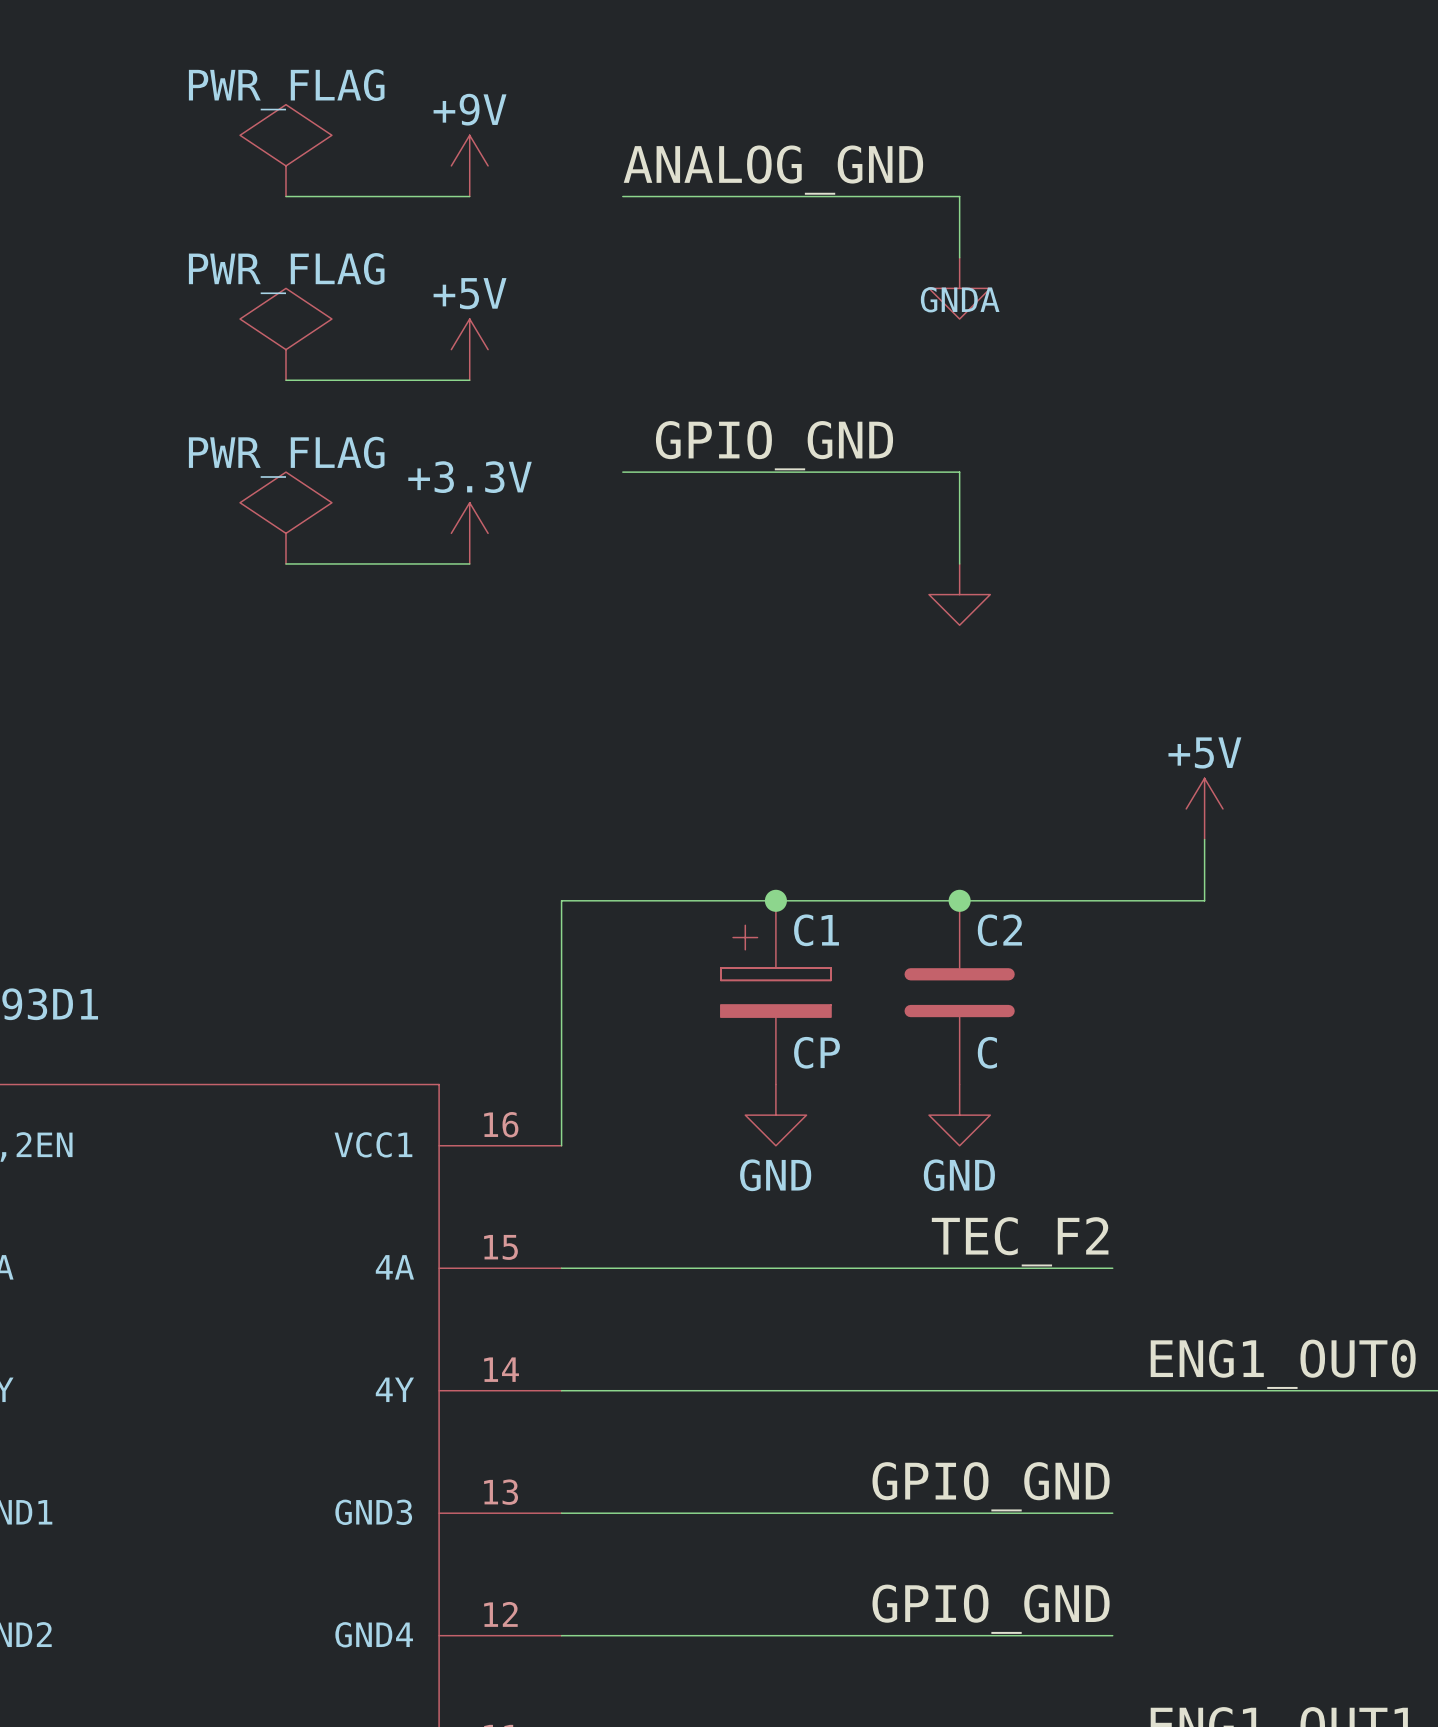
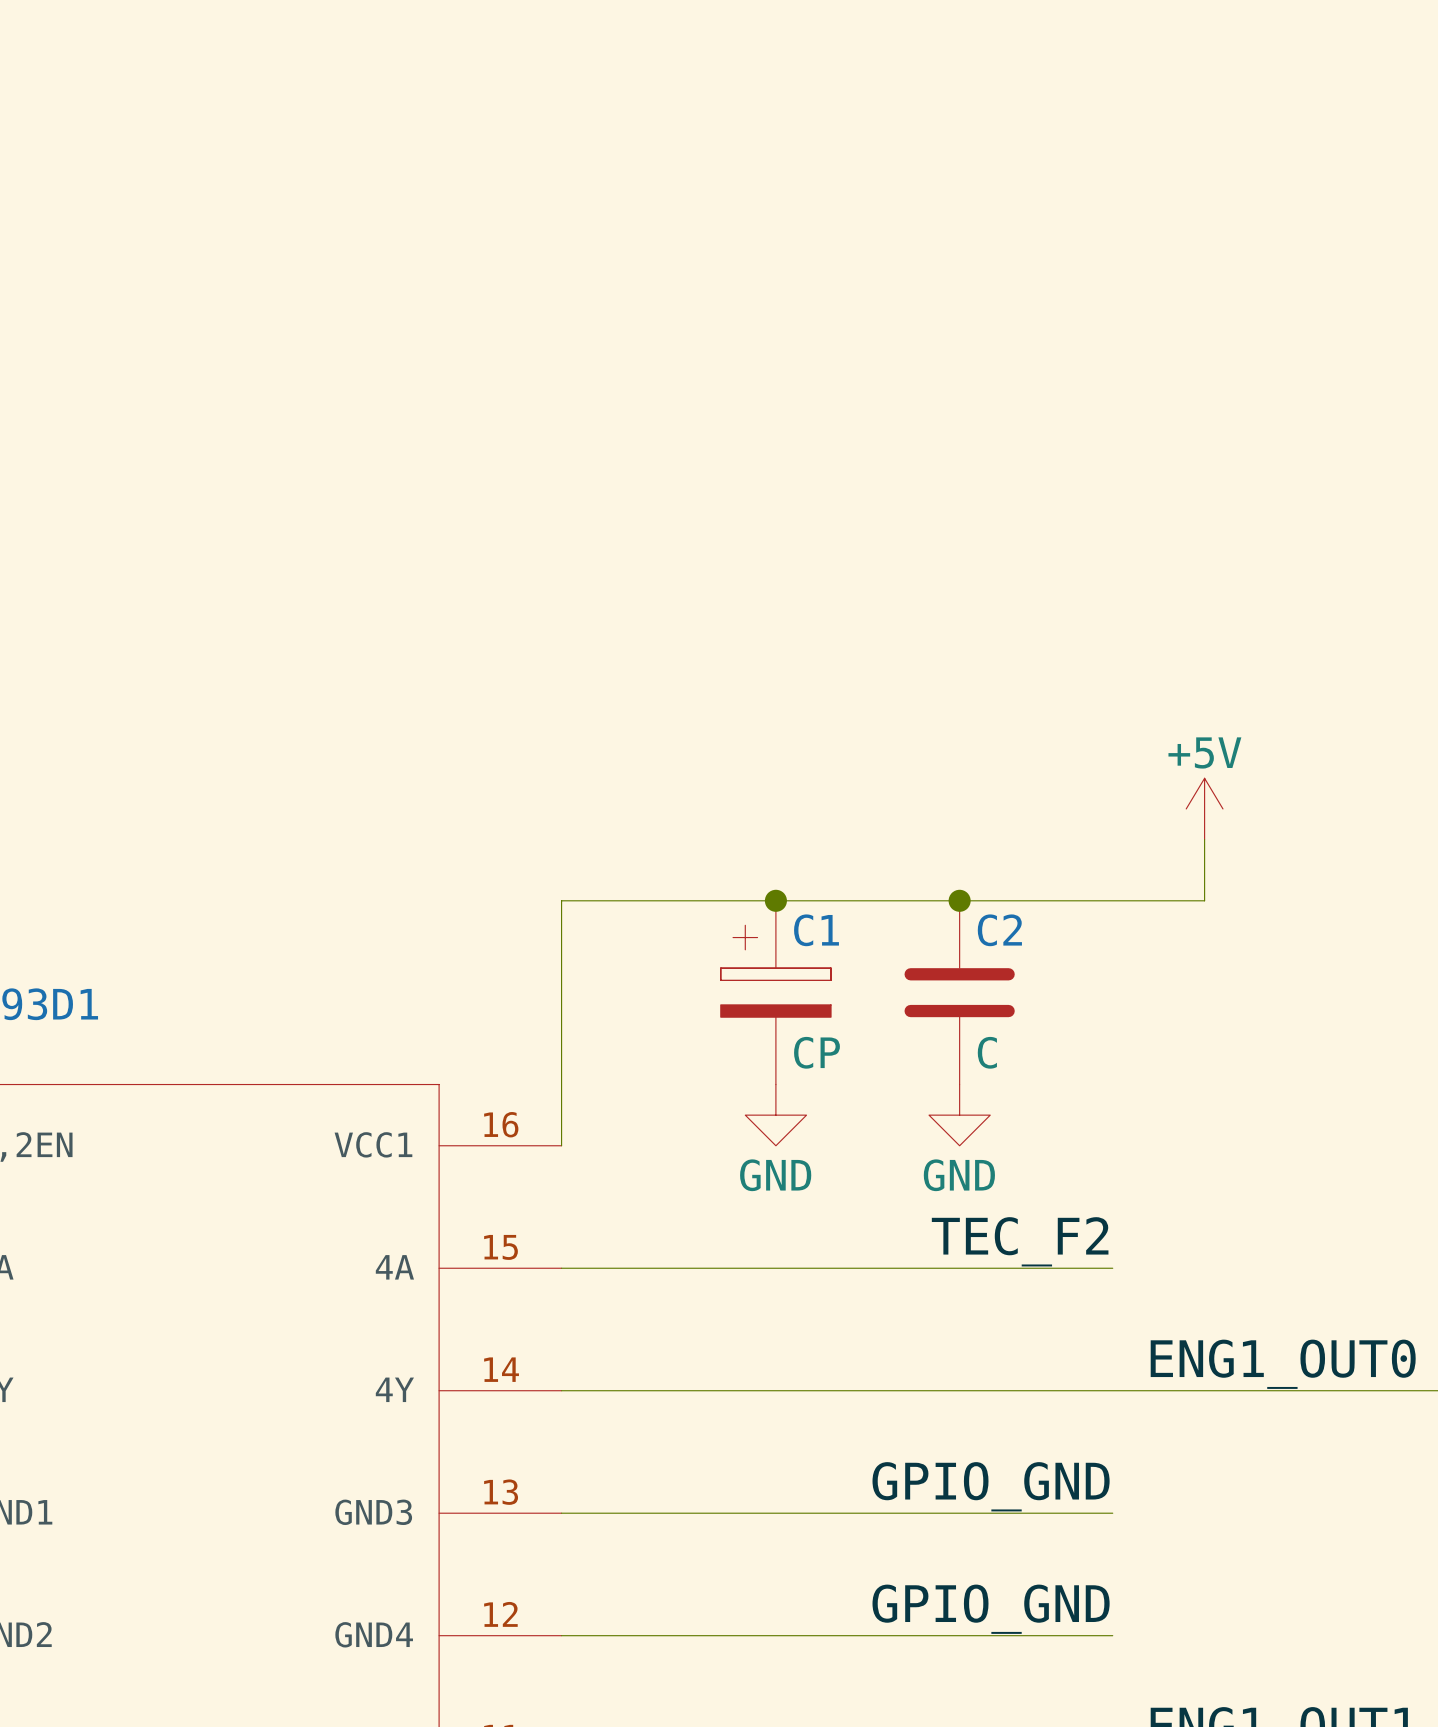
power symbol: PWR_FLAG (285, 150) -> none
power symbol: +9V (469, 165) -> none
label: ANALOG_GND (773, 170) -> none
wire: (285, 196) (469, 196) -> none
wire: (622, 196) (959, 196) (959, 257) -> none
power symbol: GNDA (959, 288) -> none
power symbol: PWR_FLAG (285, 334) -> none
power symbol: +5V (469, 349) -> none
wire: (285, 380) (469, 380) -> none
label: GPIO_GND (774, 445) -> none
wire: (622, 472) (959, 472) (959, 563) -> none
power symbol: PWR_FLAG (285, 518) -> none
power symbol: +3.3V (469, 533) -> none
wire: (285, 563) (469, 563) -> none
power symbol: (959, 594) -> none

